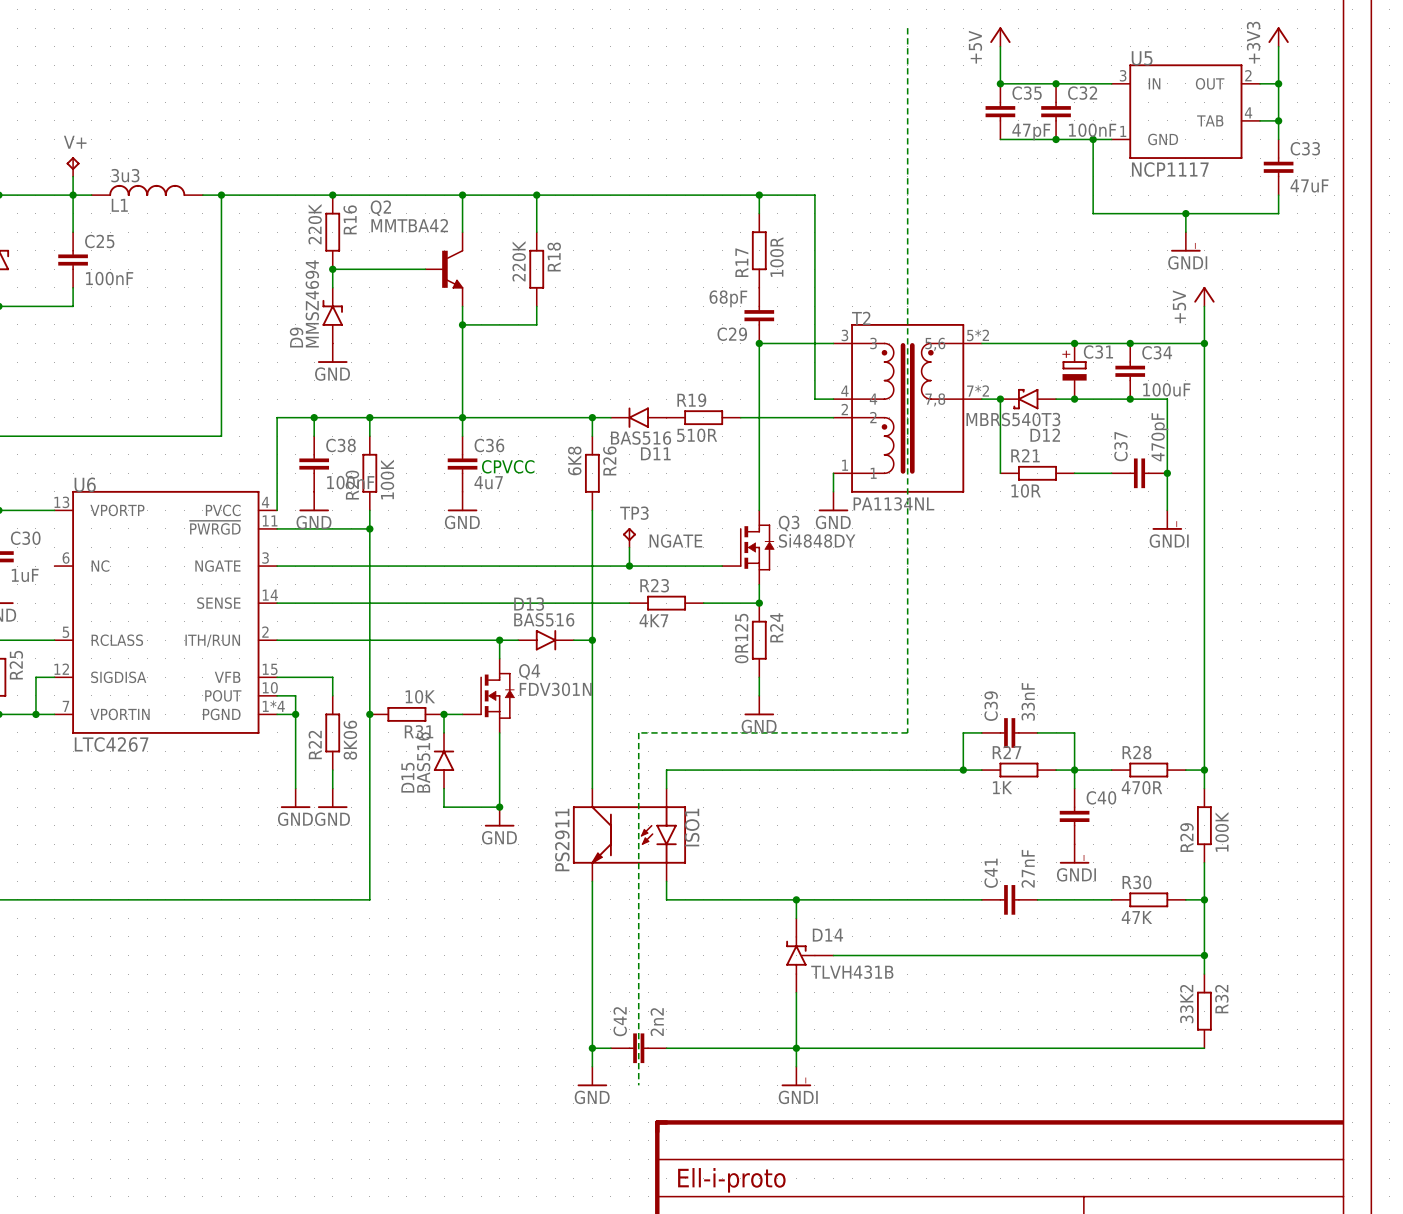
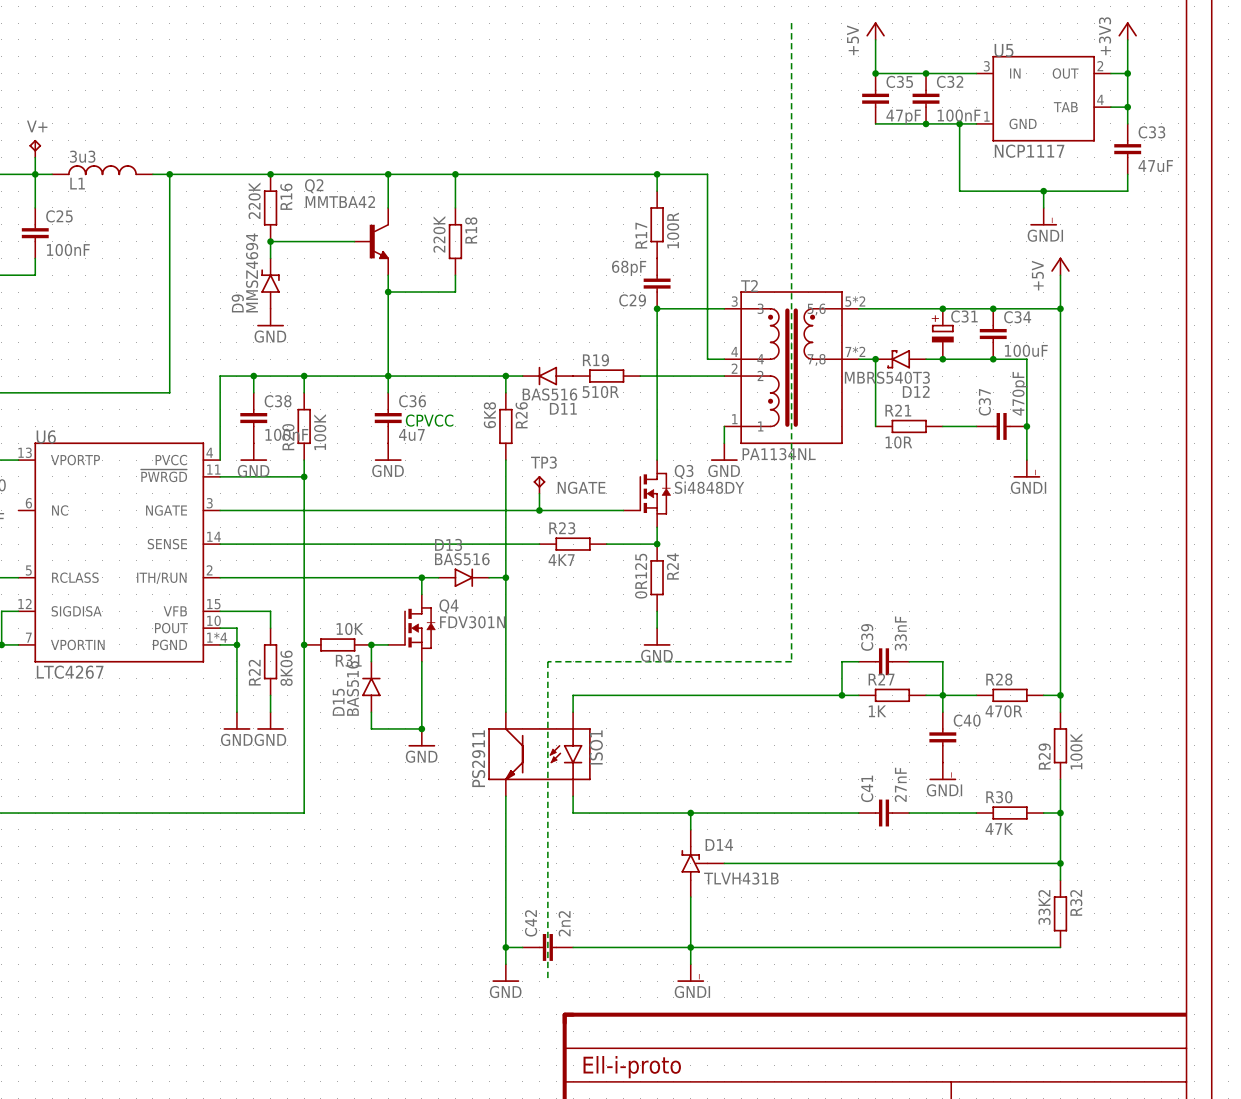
T2 symbol: [833, 324, 982, 493] -> [724, 291, 859, 445]

